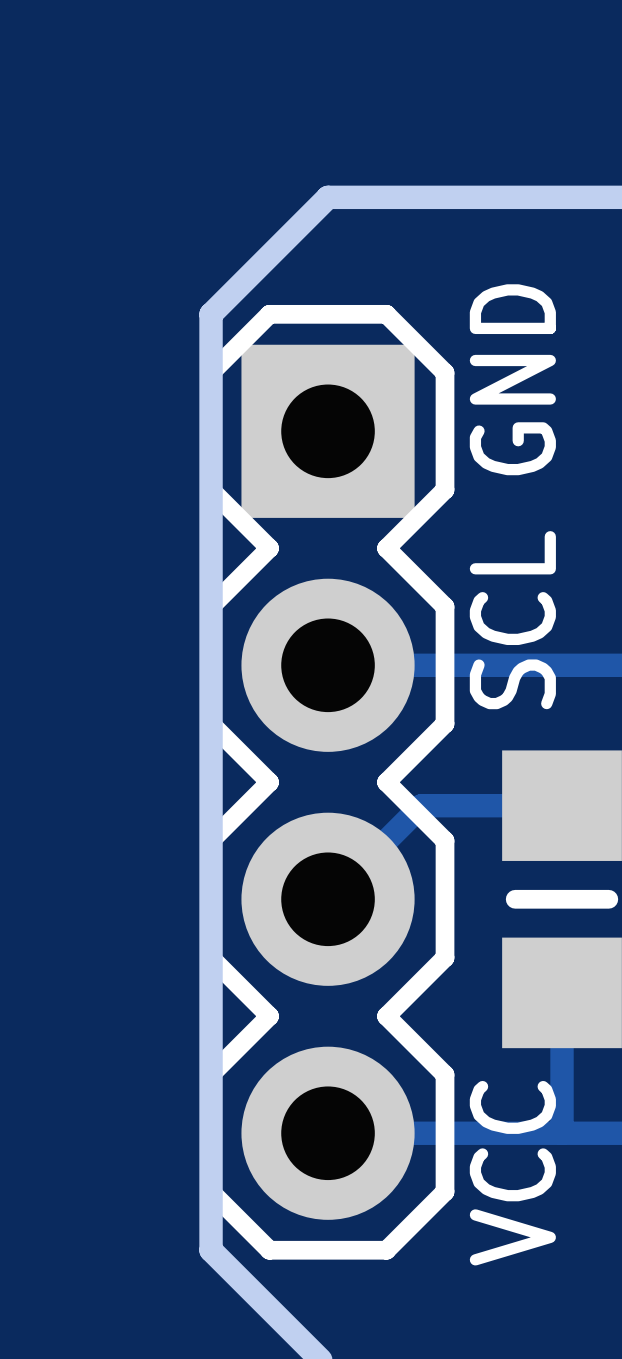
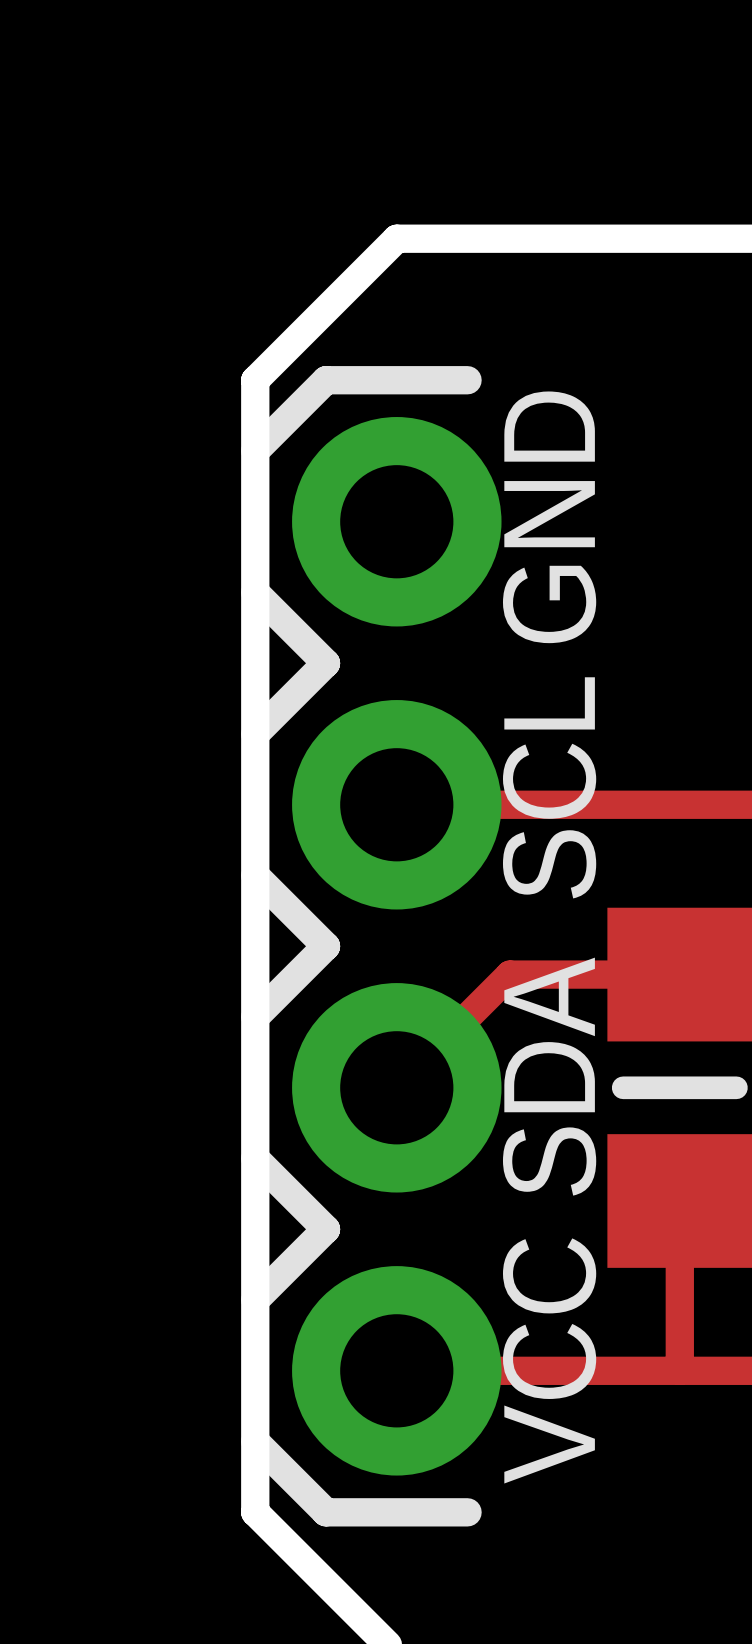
part footprint: [201, 304, 455, 1260] -> [292, 417, 502, 1476]
line: none -> (467, 380) (326, 380) (255, 450)
text position: GND (512, 379) -> GND (549, 517)
line: none -> (255, 592) (326, 663) (255, 734)
text position: SCL (512, 620) -> SCL (549, 787)
line: none -> (255, 875) (326, 946) (255, 1017)
text: none -> SDA (549, 1076)
line: none -> (255, 1158) (326, 1229) (255, 1300)
text position: VCC (512, 1173) -> VCC (549, 1360)
line: none -> (255, 1441) (326, 1512) (467, 1512)

